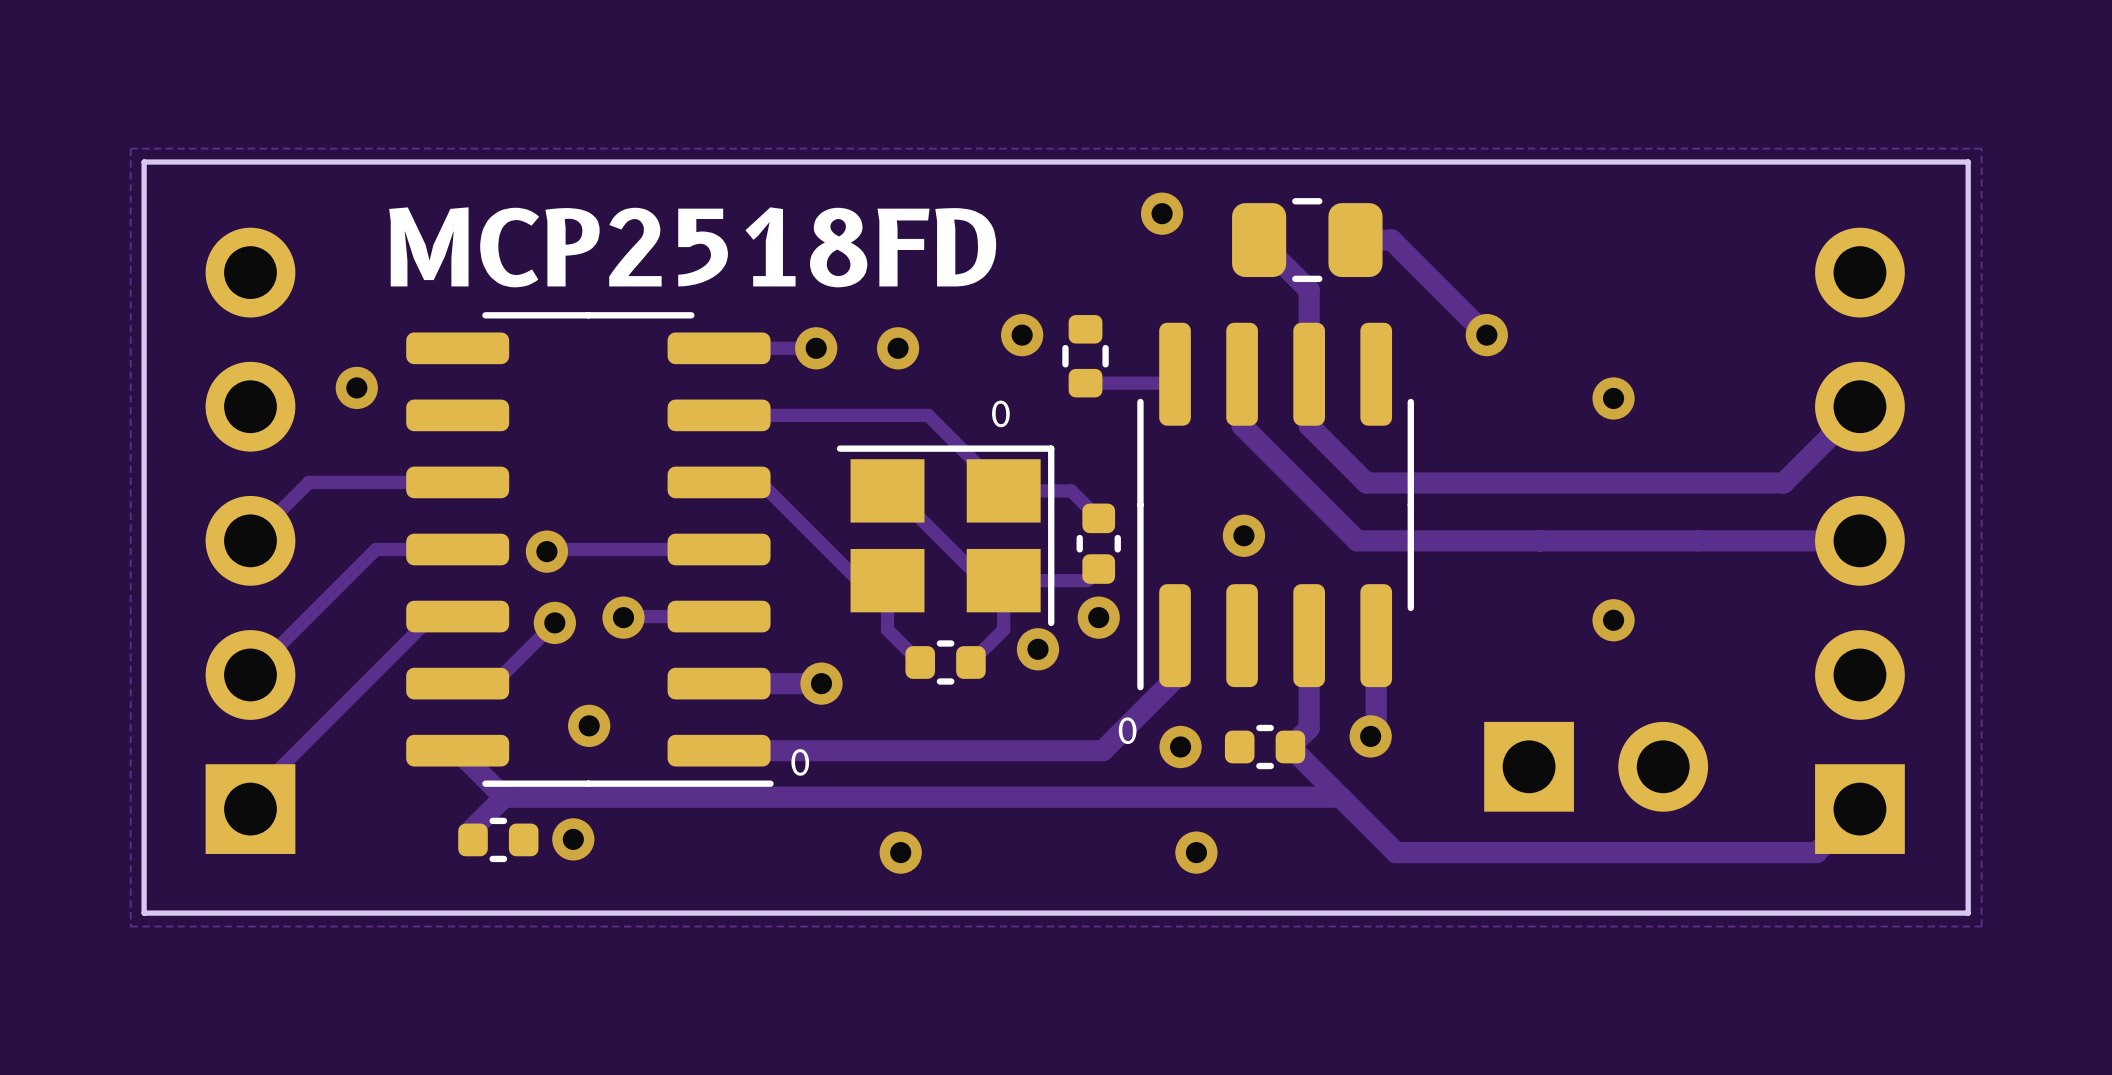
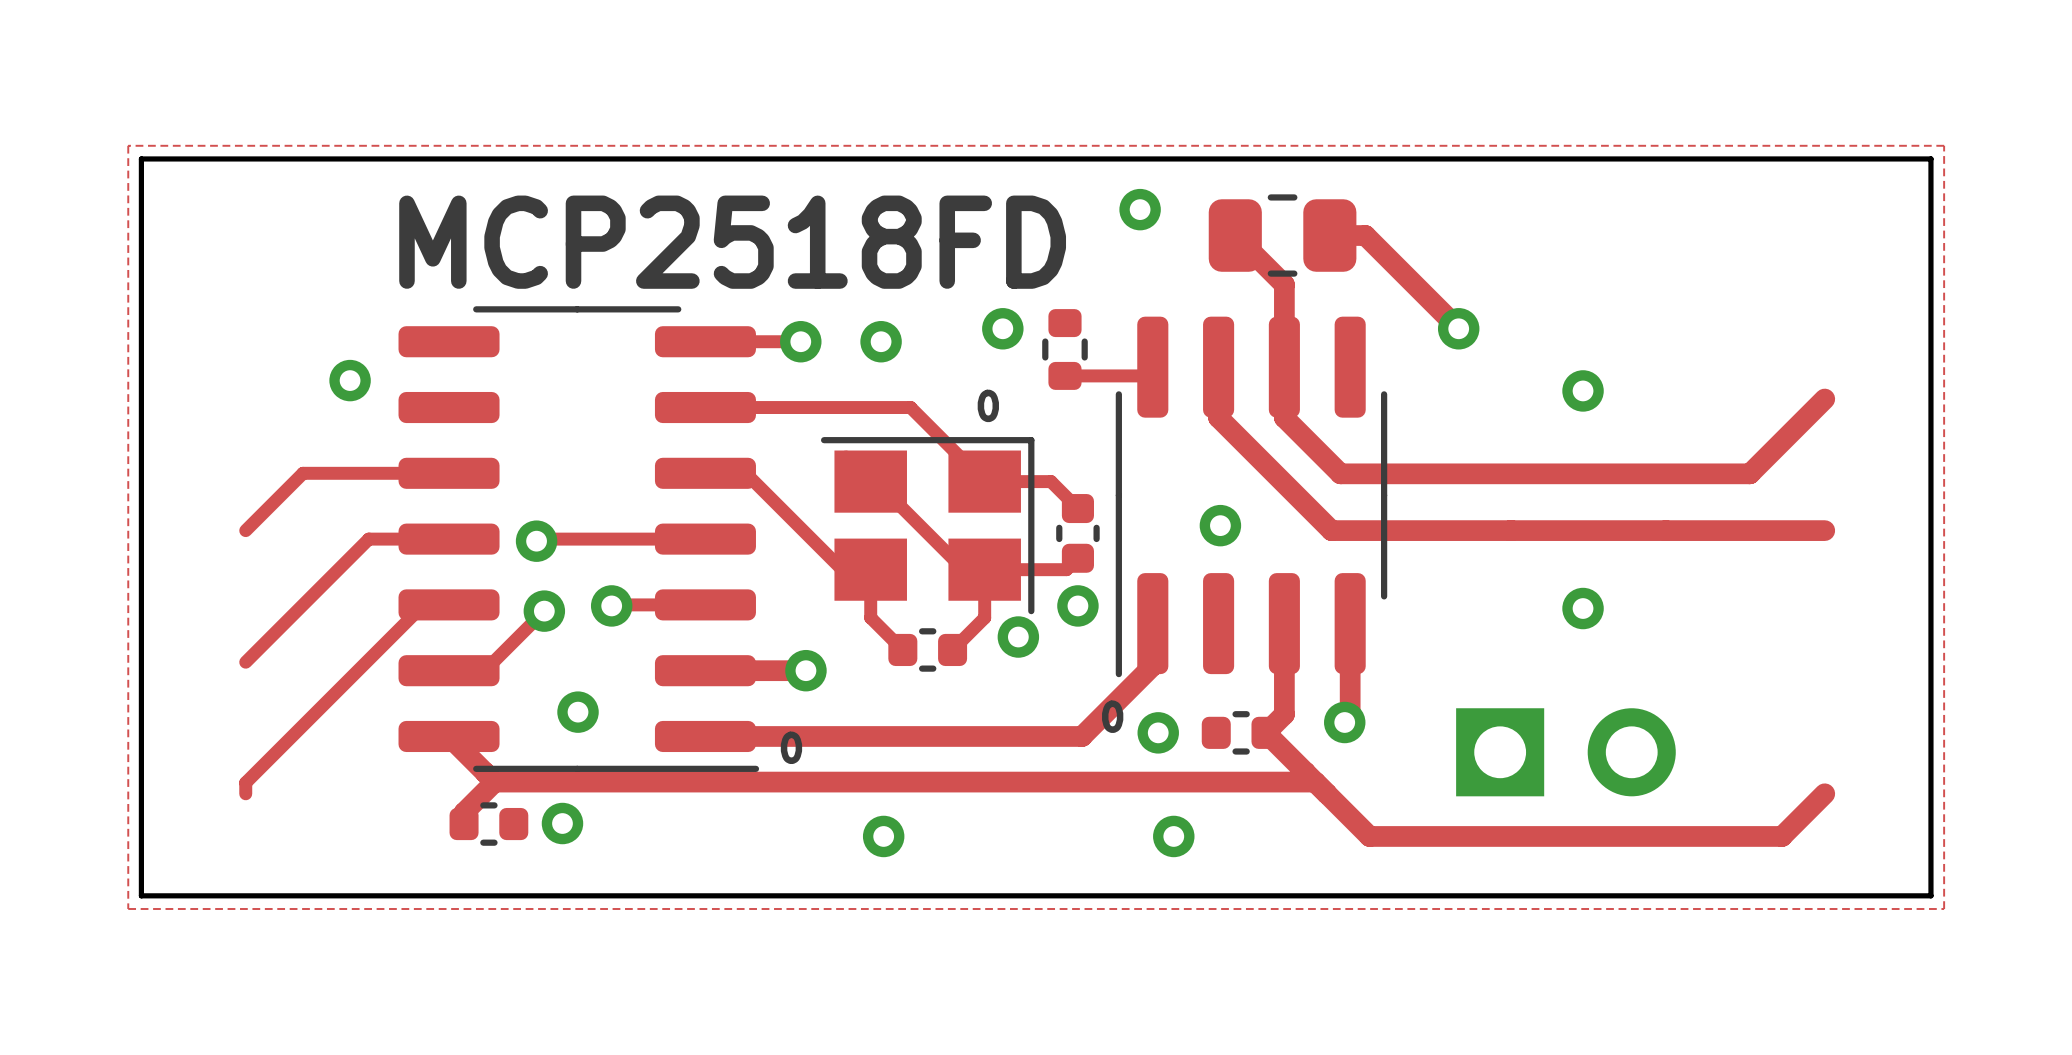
part: (250, 540) -> none
part: (1859, 540) -> none

